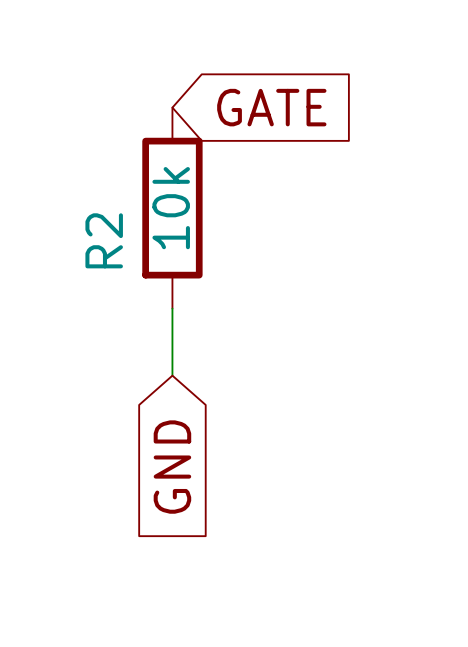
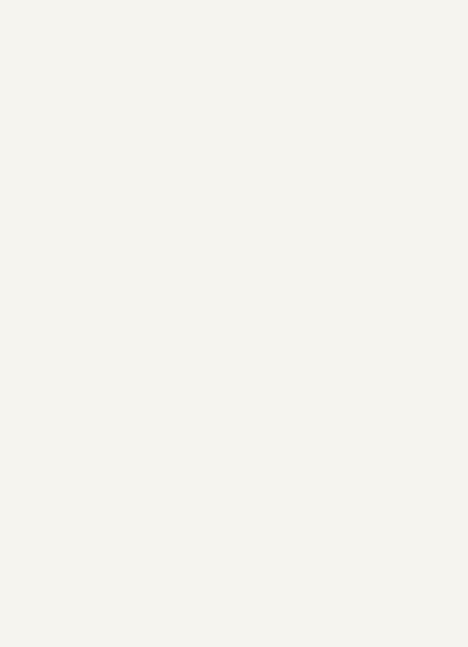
global label: GATE (271, 107) -> none
R2: 10k (172, 208) -> none
wire: (172, 308) (172, 375) -> none
global label: GND (172, 467) -> none

